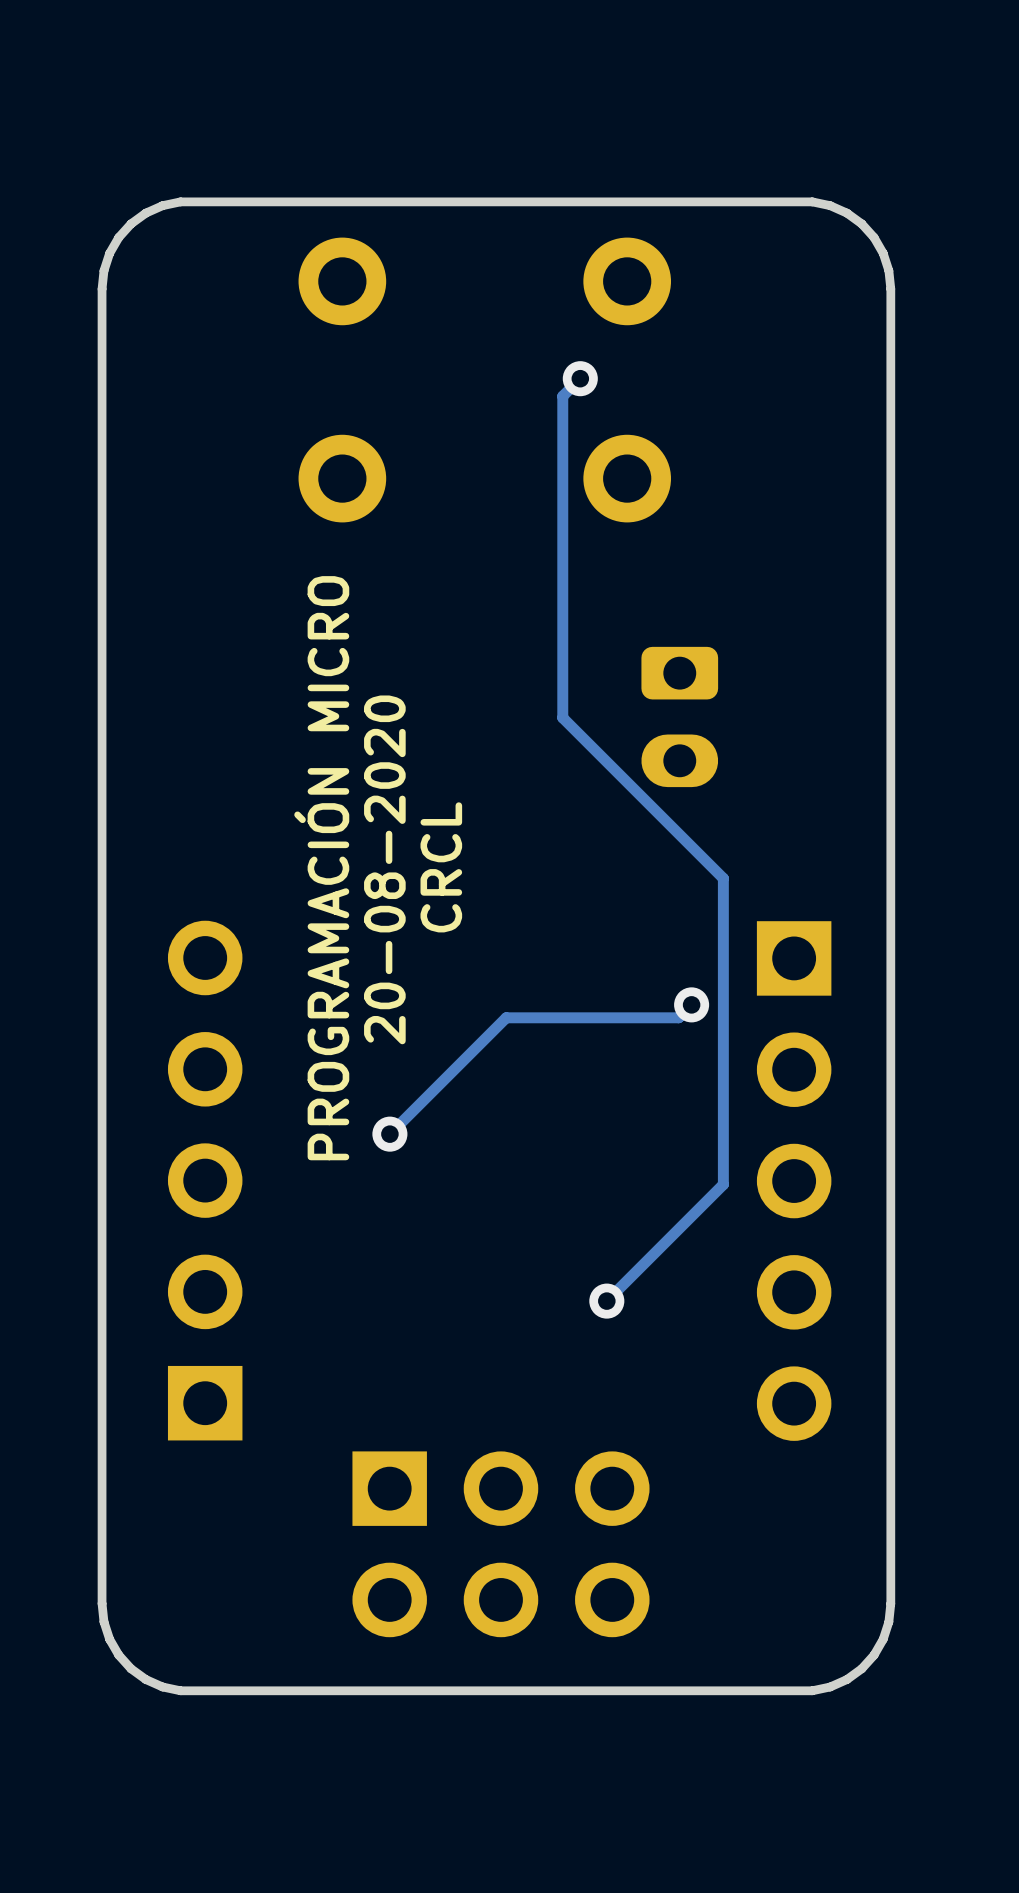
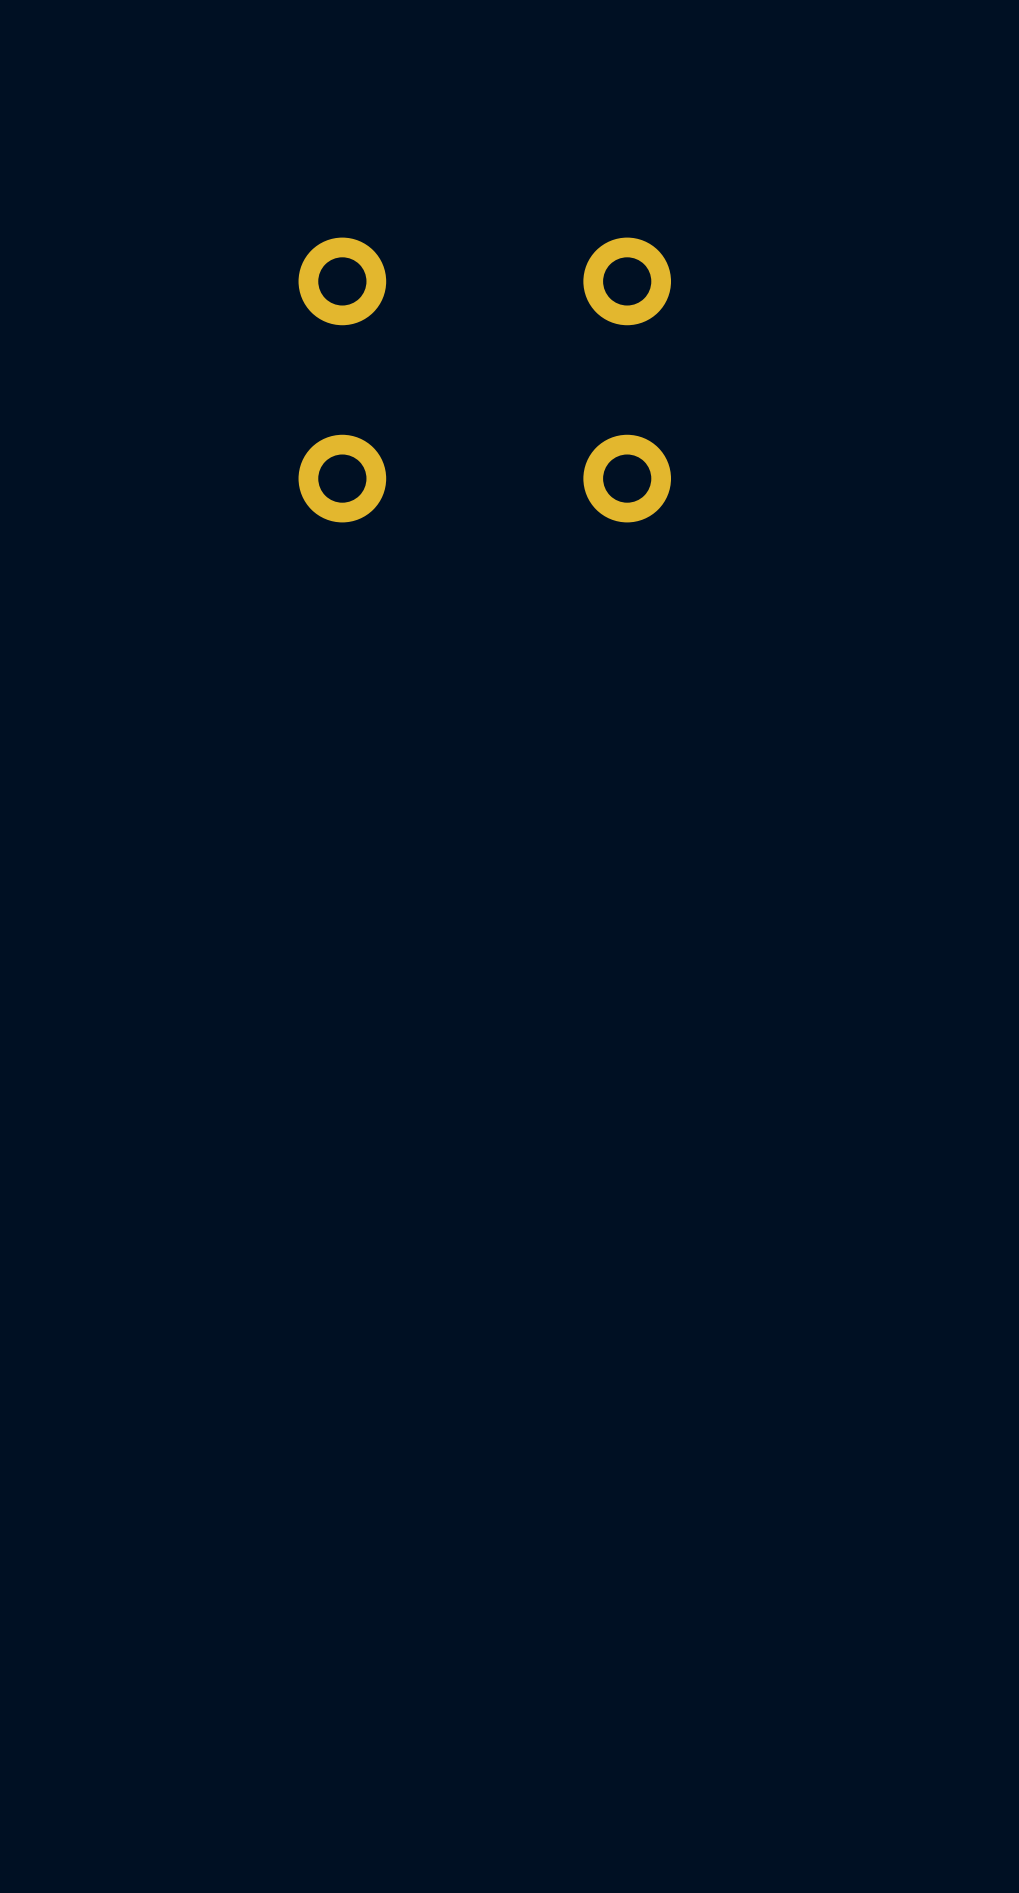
board edge: (812, 201) (830, 205) (846, 213) (861, 223) (874, 237) (883, 253) (888, 270) (890, 289) (890, 1603) (888, 1621) (883, 1639) (874, 1655) (861, 1668) (846, 1679) (830, 1686) (812, 1690) (180, 1690) (162, 1686) (145, 1679) (131, 1668) (118, 1655) (109, 1639) (103, 1621) (102, 1603) (102, 289) (103, 270) (109, 253) (118, 237) (131, 223) (145, 213) (162, 205) (180, 201) (812, 201) -> none
track: (580, 378) (562, 396) (562, 717) (723, 878) (723, 1184) (606, 1301) -> none
via: (580, 378) -> none
part: (679, 716) -> none
text: CRCL (441, 867) -> none
text: PROGRAMACIÓN MICRO (321, 868) -> none
text: 20-08-2020 (384, 869) -> none
track: (691, 1004) (678, 1017) (506, 1017) (389, 1134) -> none
via: (691, 1004) -> none
via: (389, 1134) -> none
part: (205, 1180) -> none
part: (794, 1181) -> none
via: (606, 1301) -> none
part: (500, 1544) -> none

